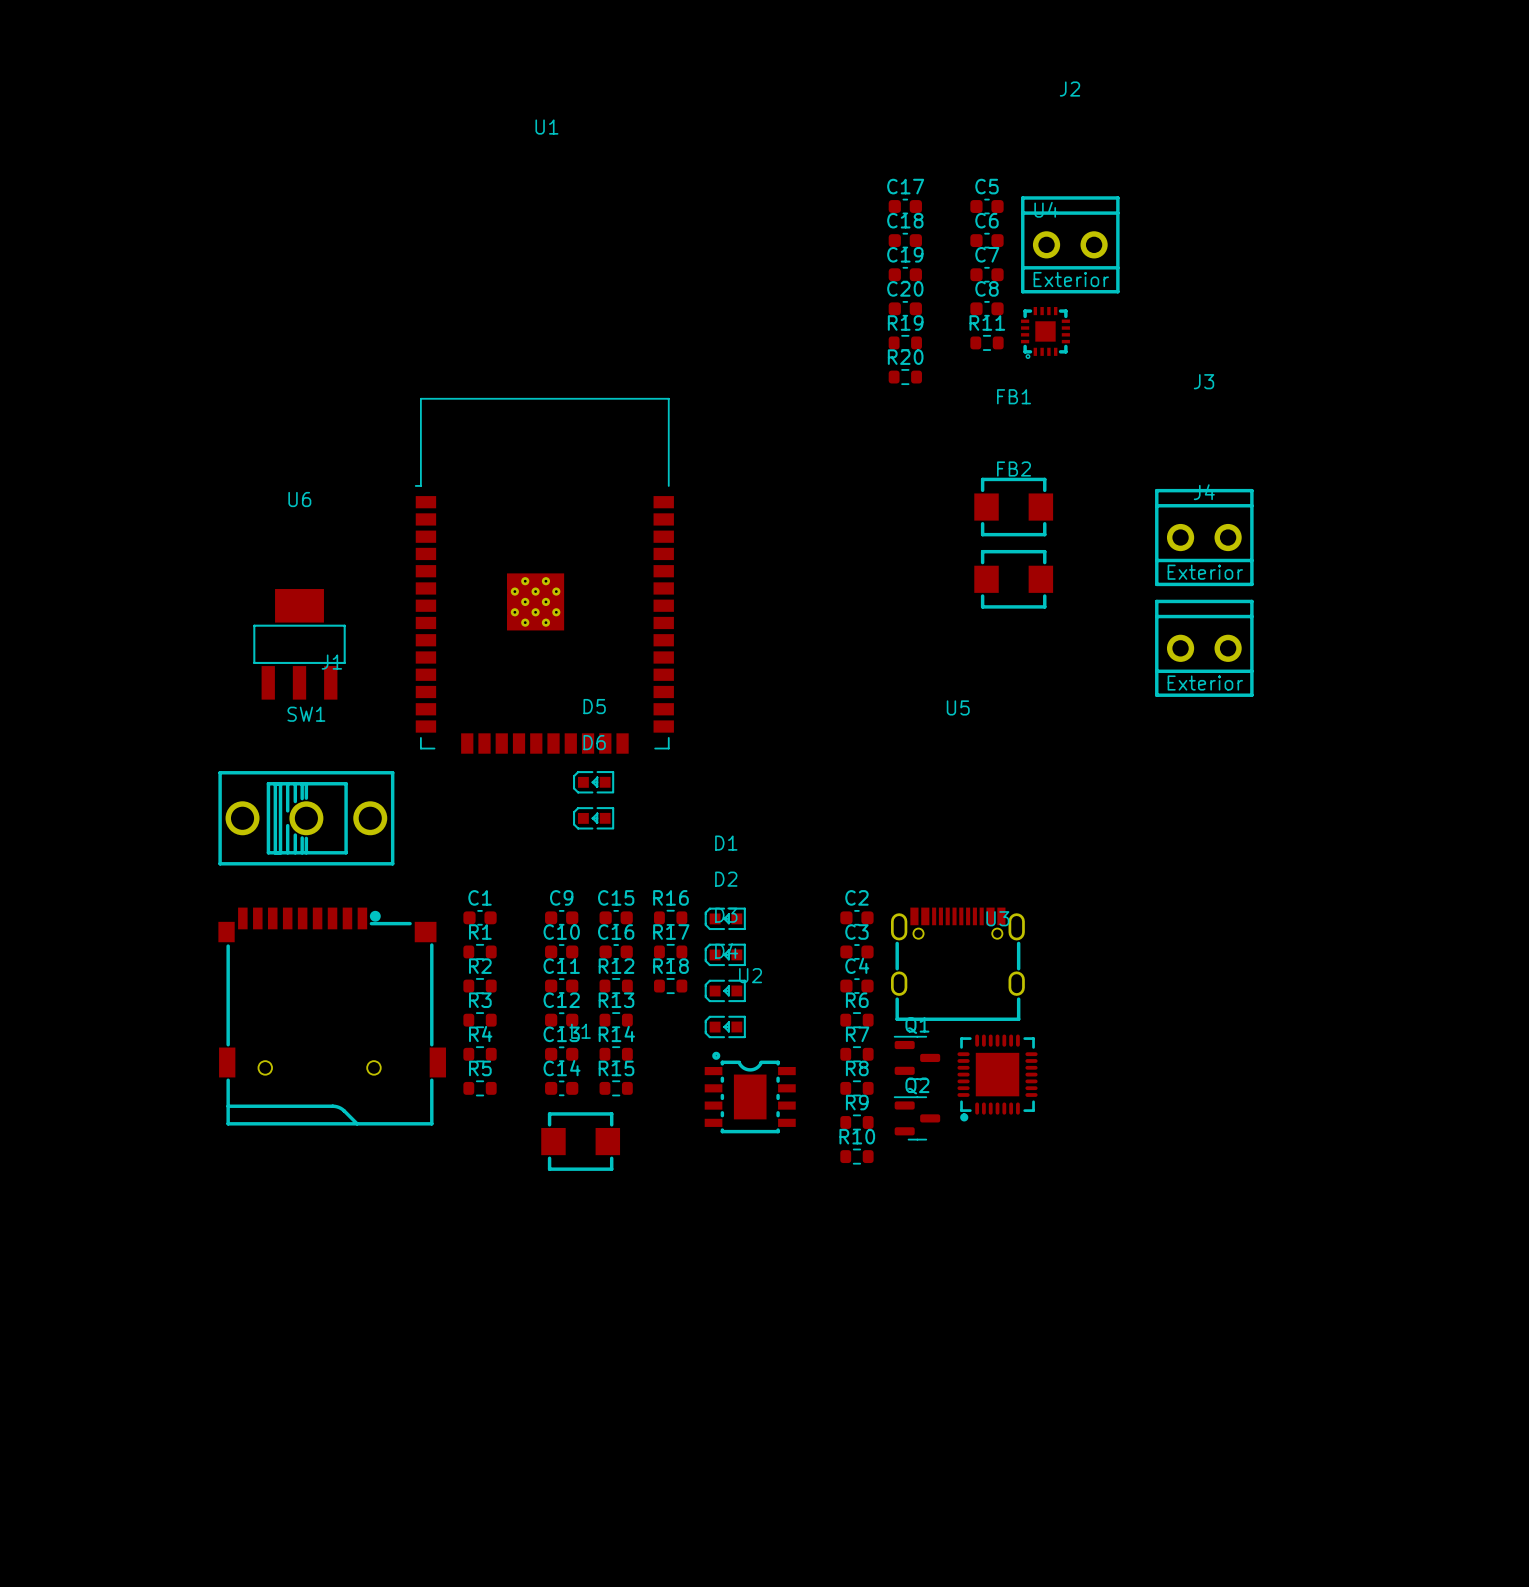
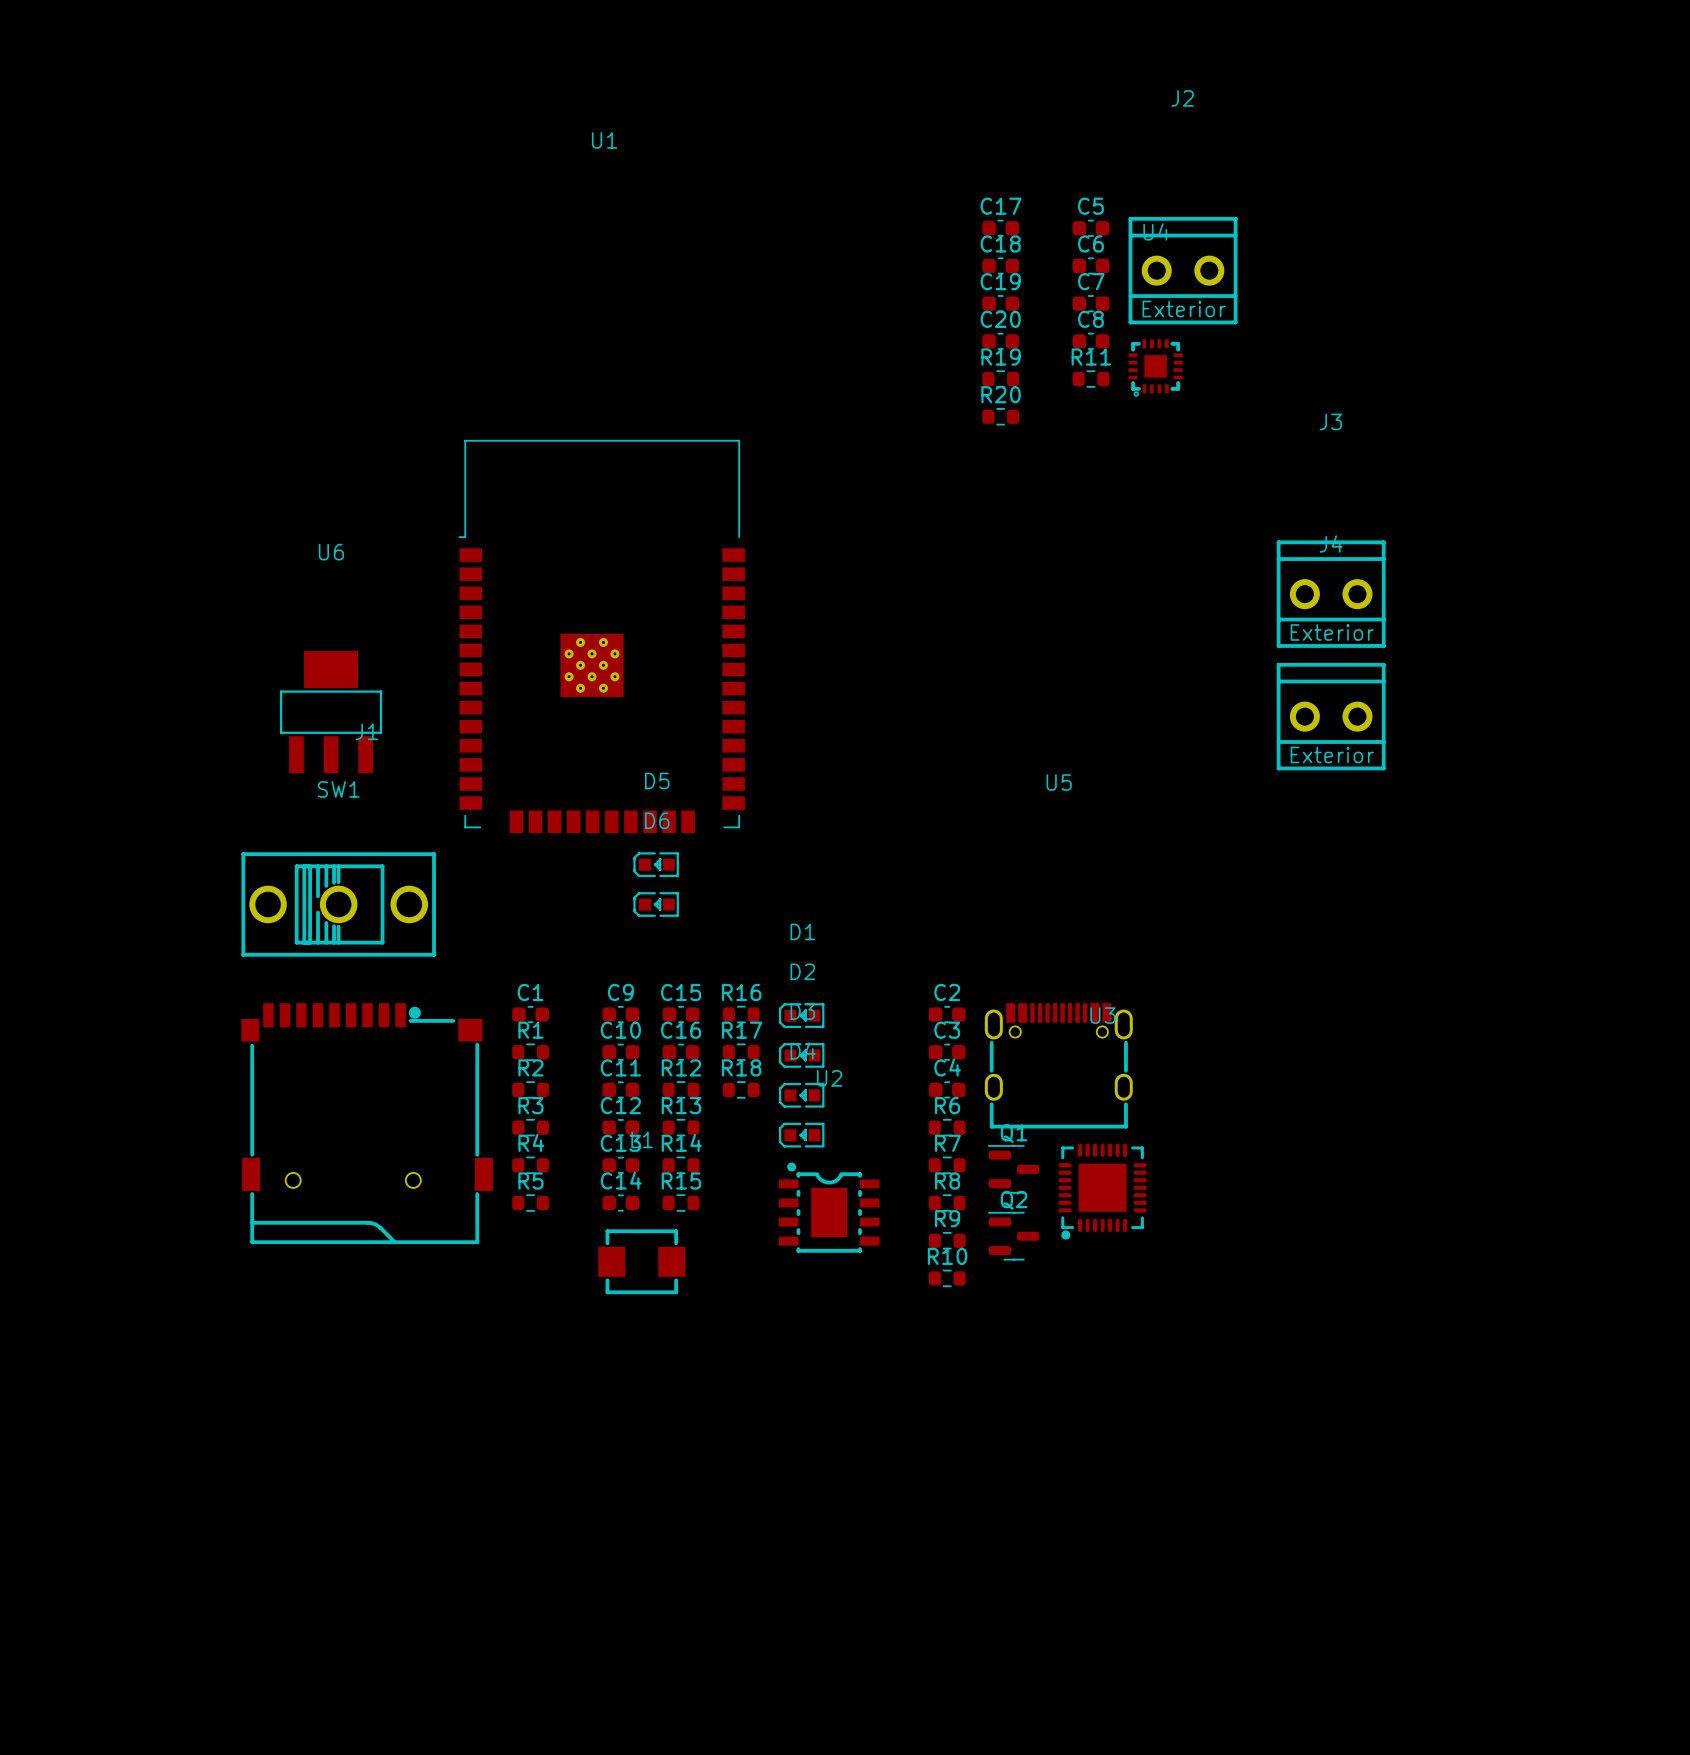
FB1: (1013, 507) -> none
FB2: (1013, 579) -> none

